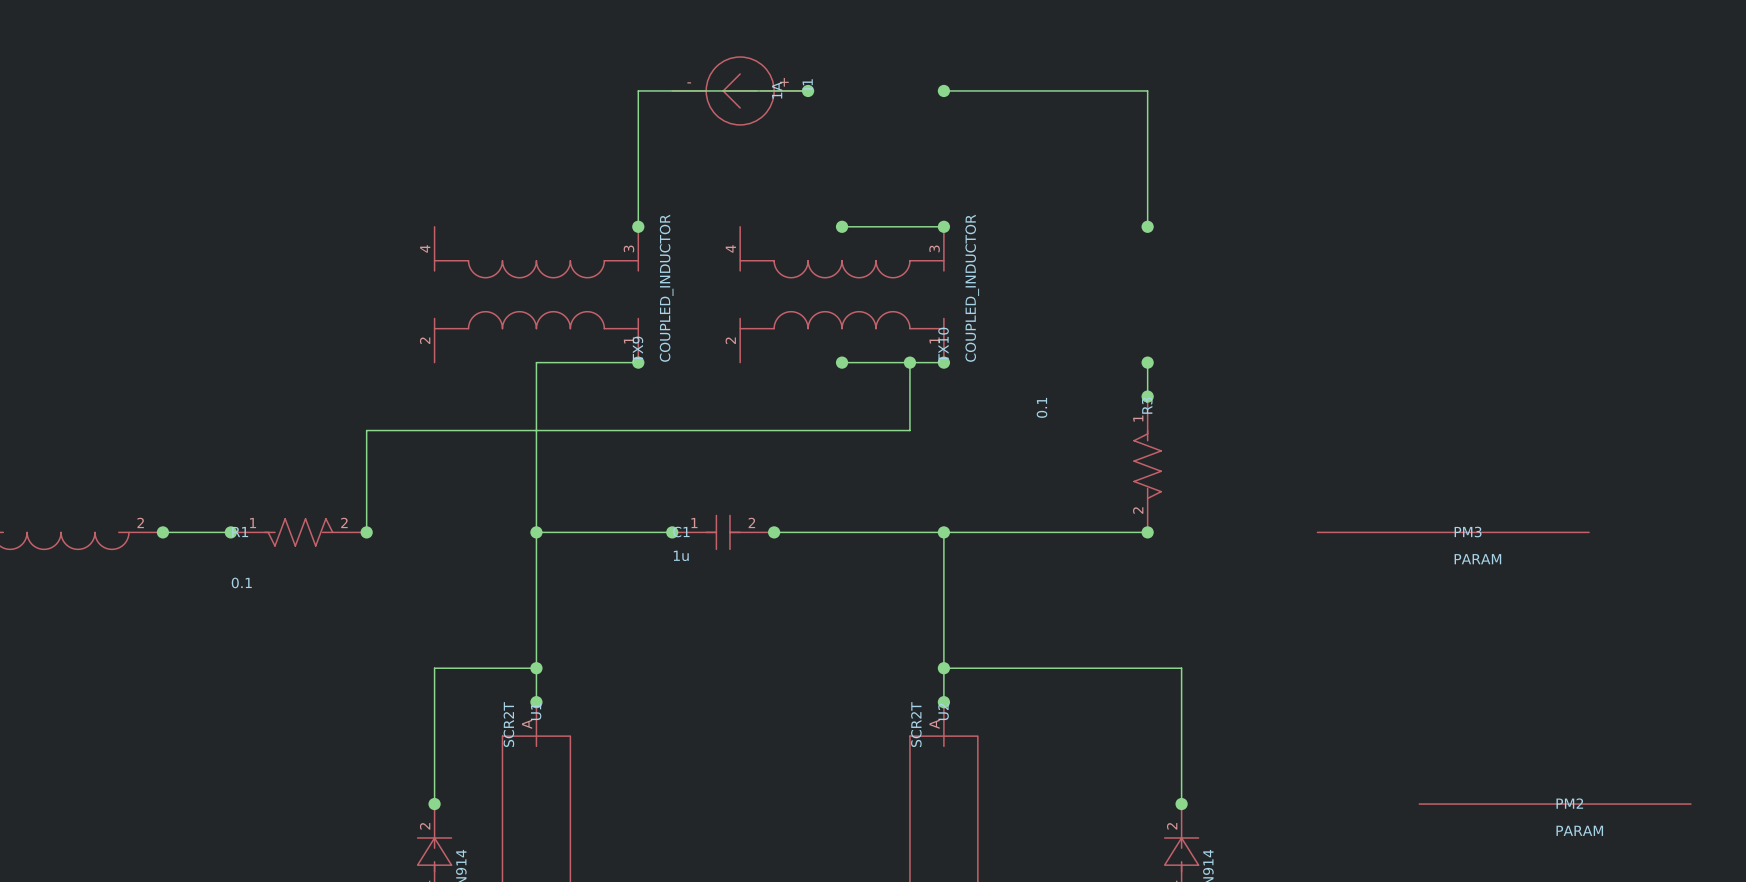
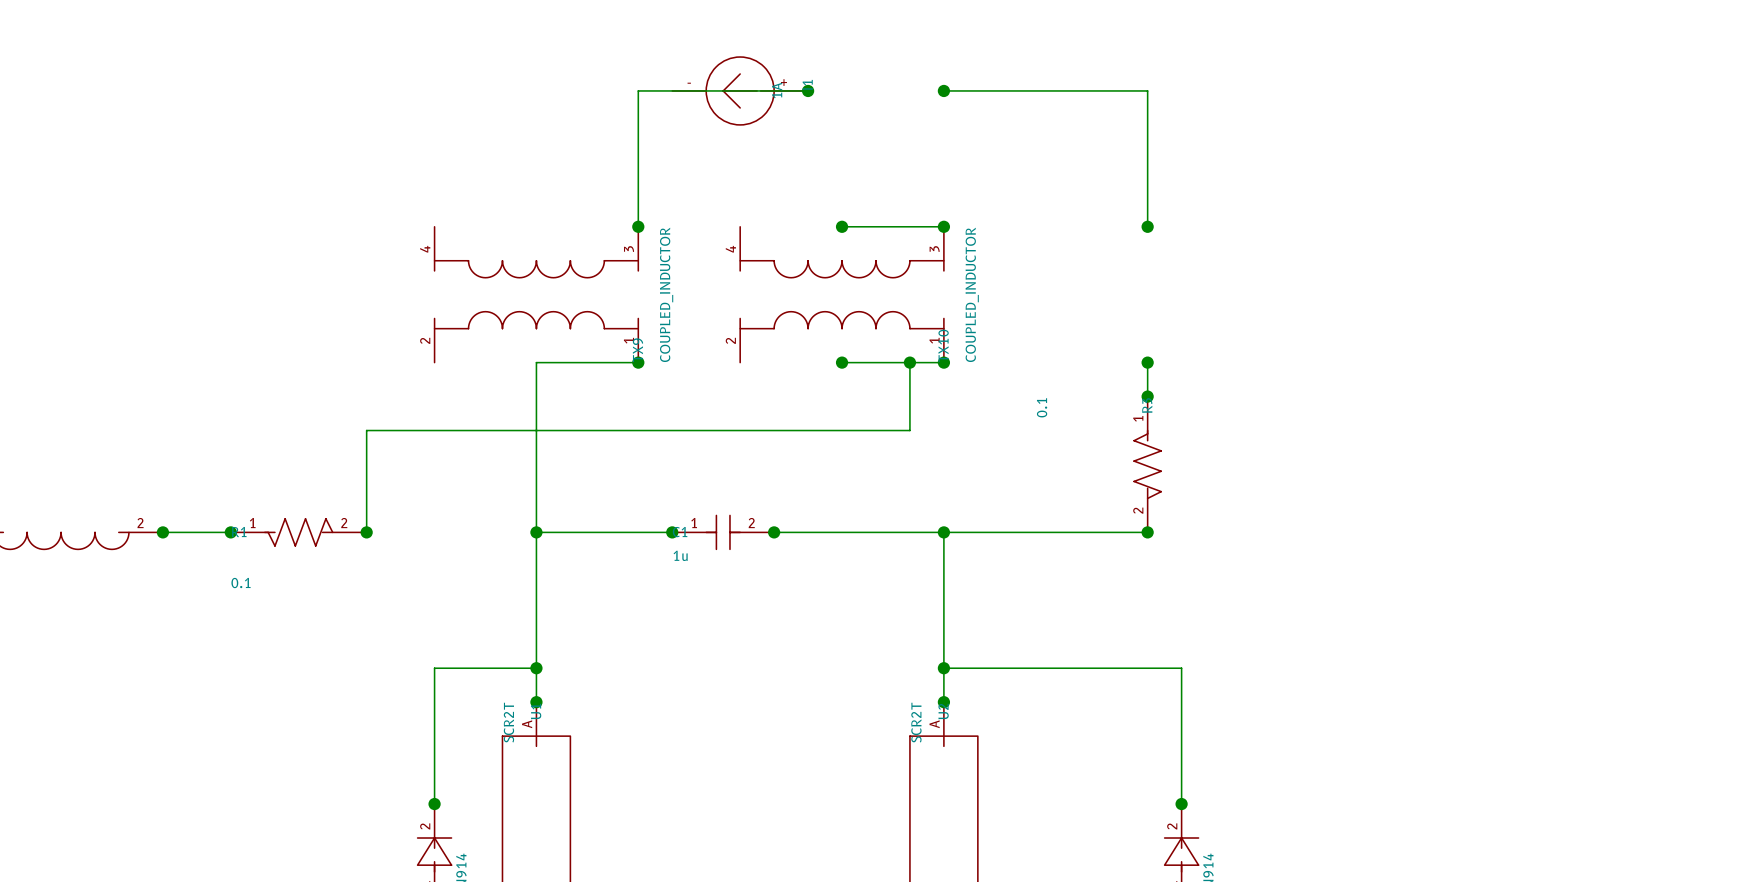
PM3: PARAM (1453, 532) -> none
PM2: PARAM (1555, 804) -> none

